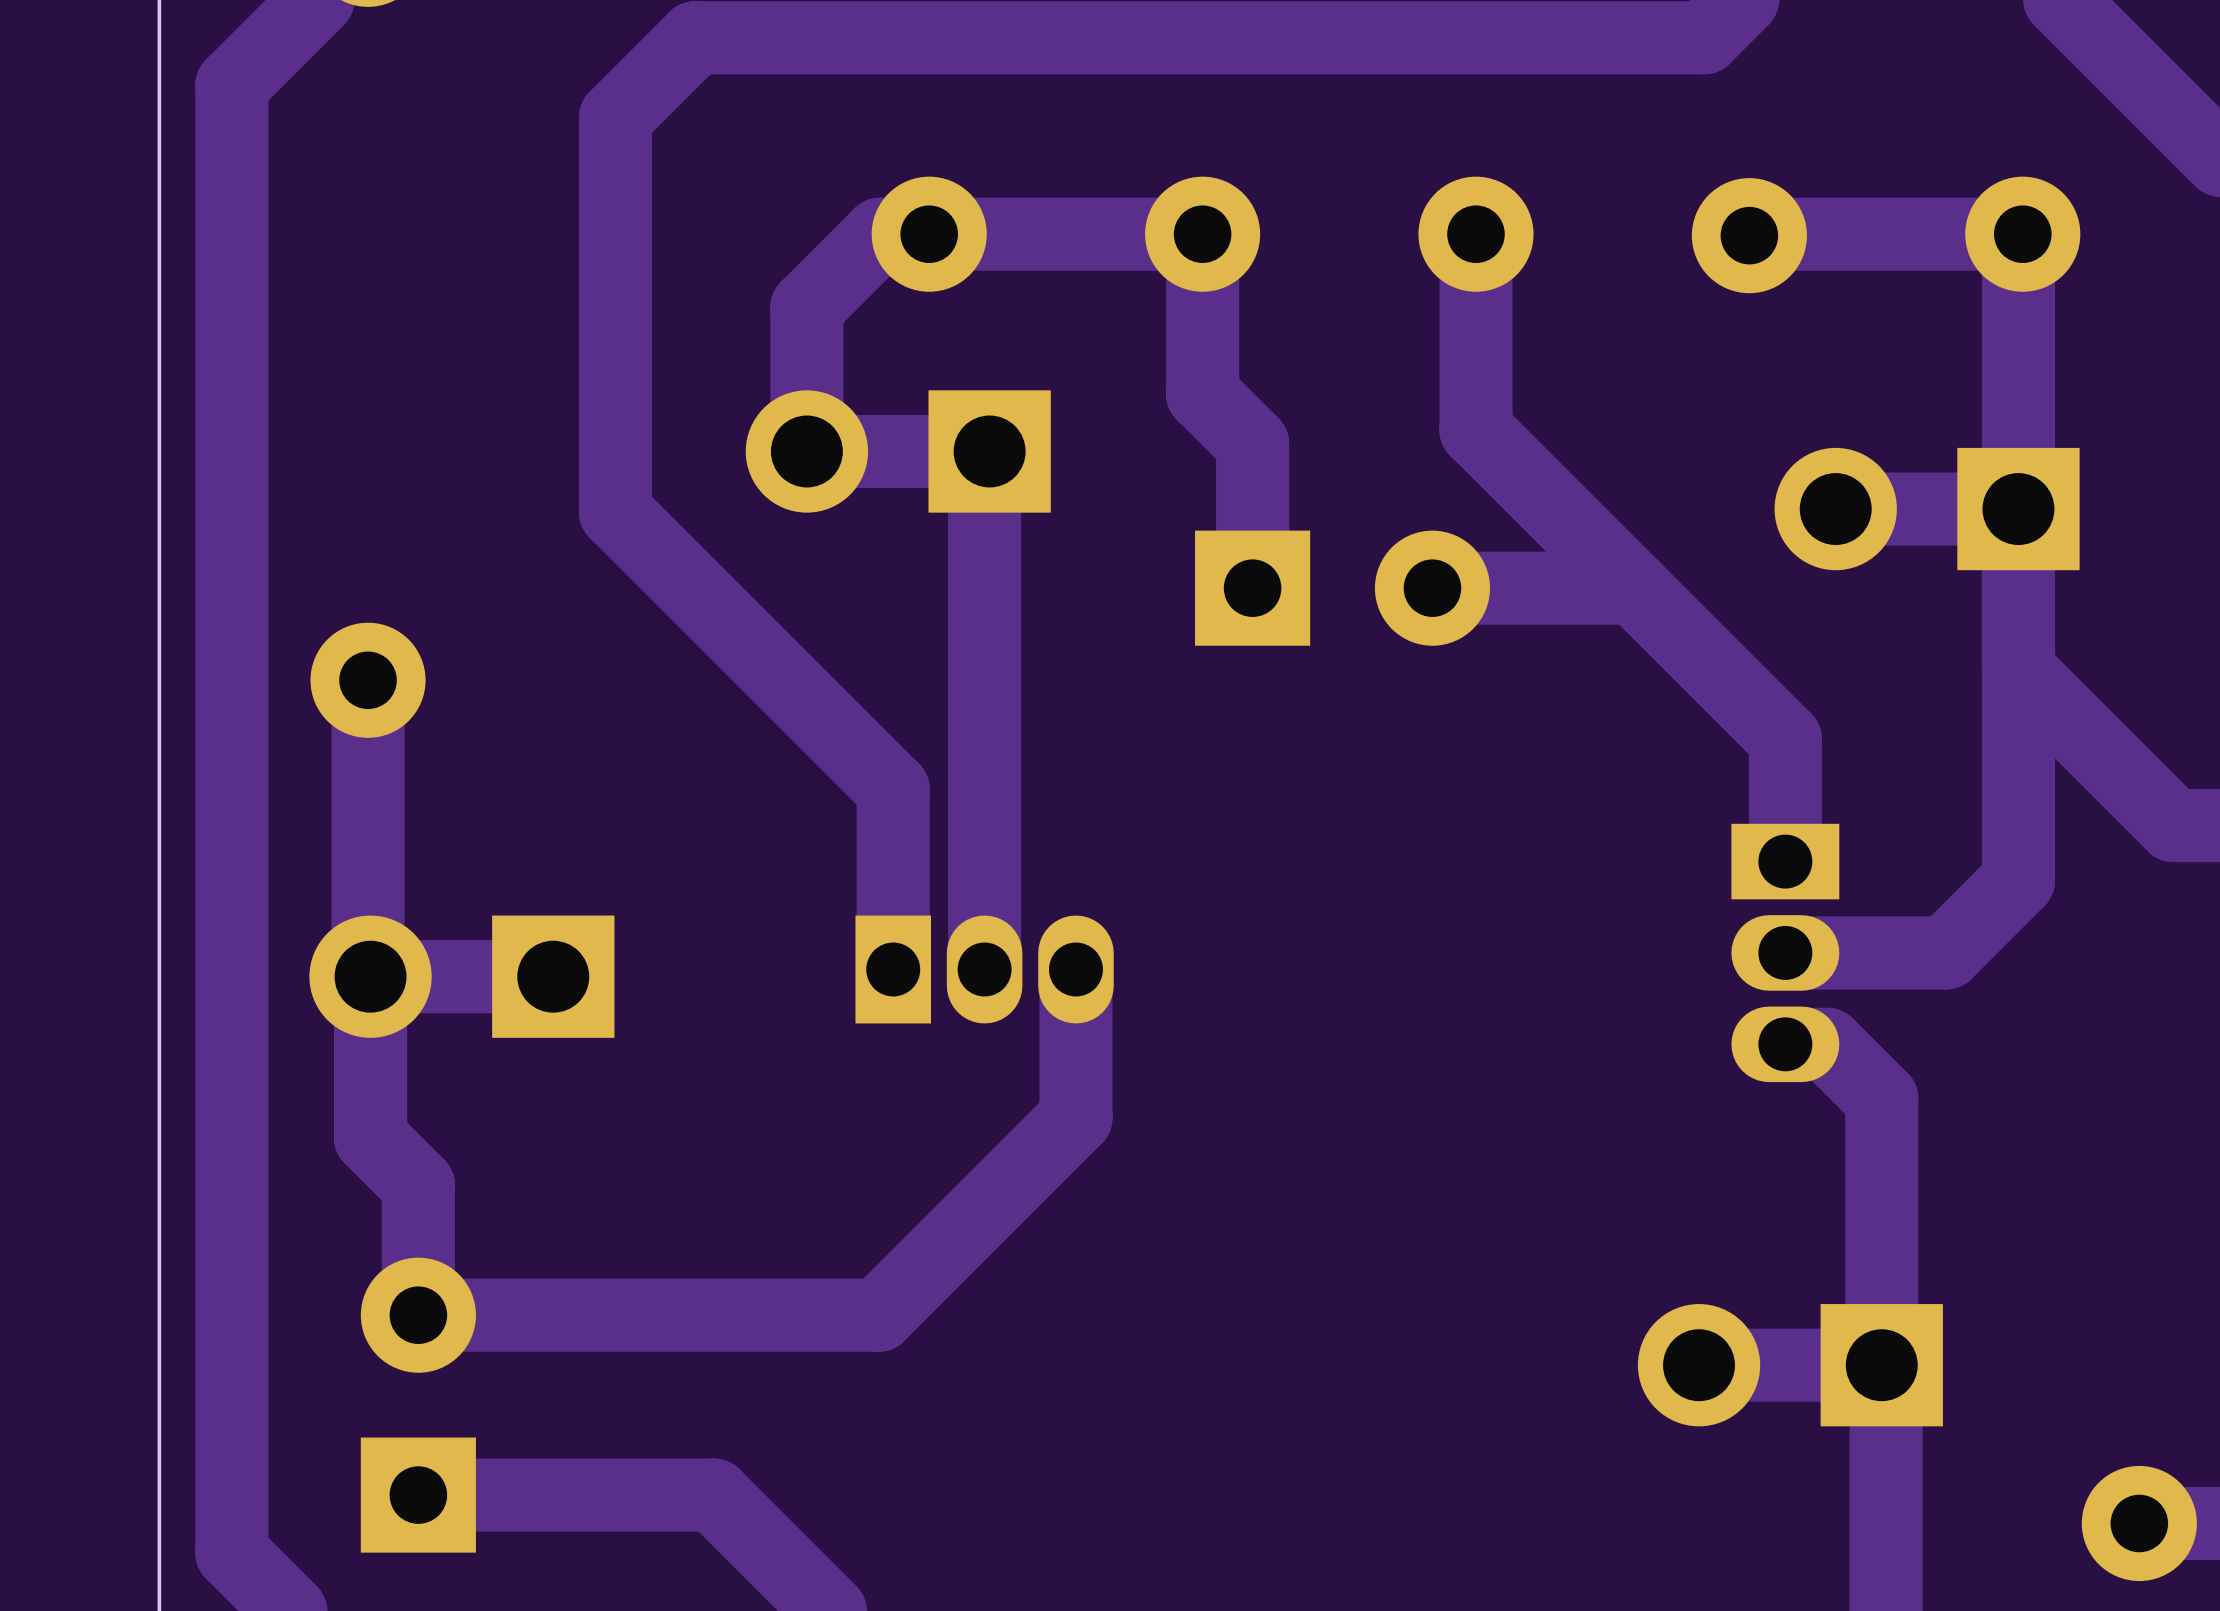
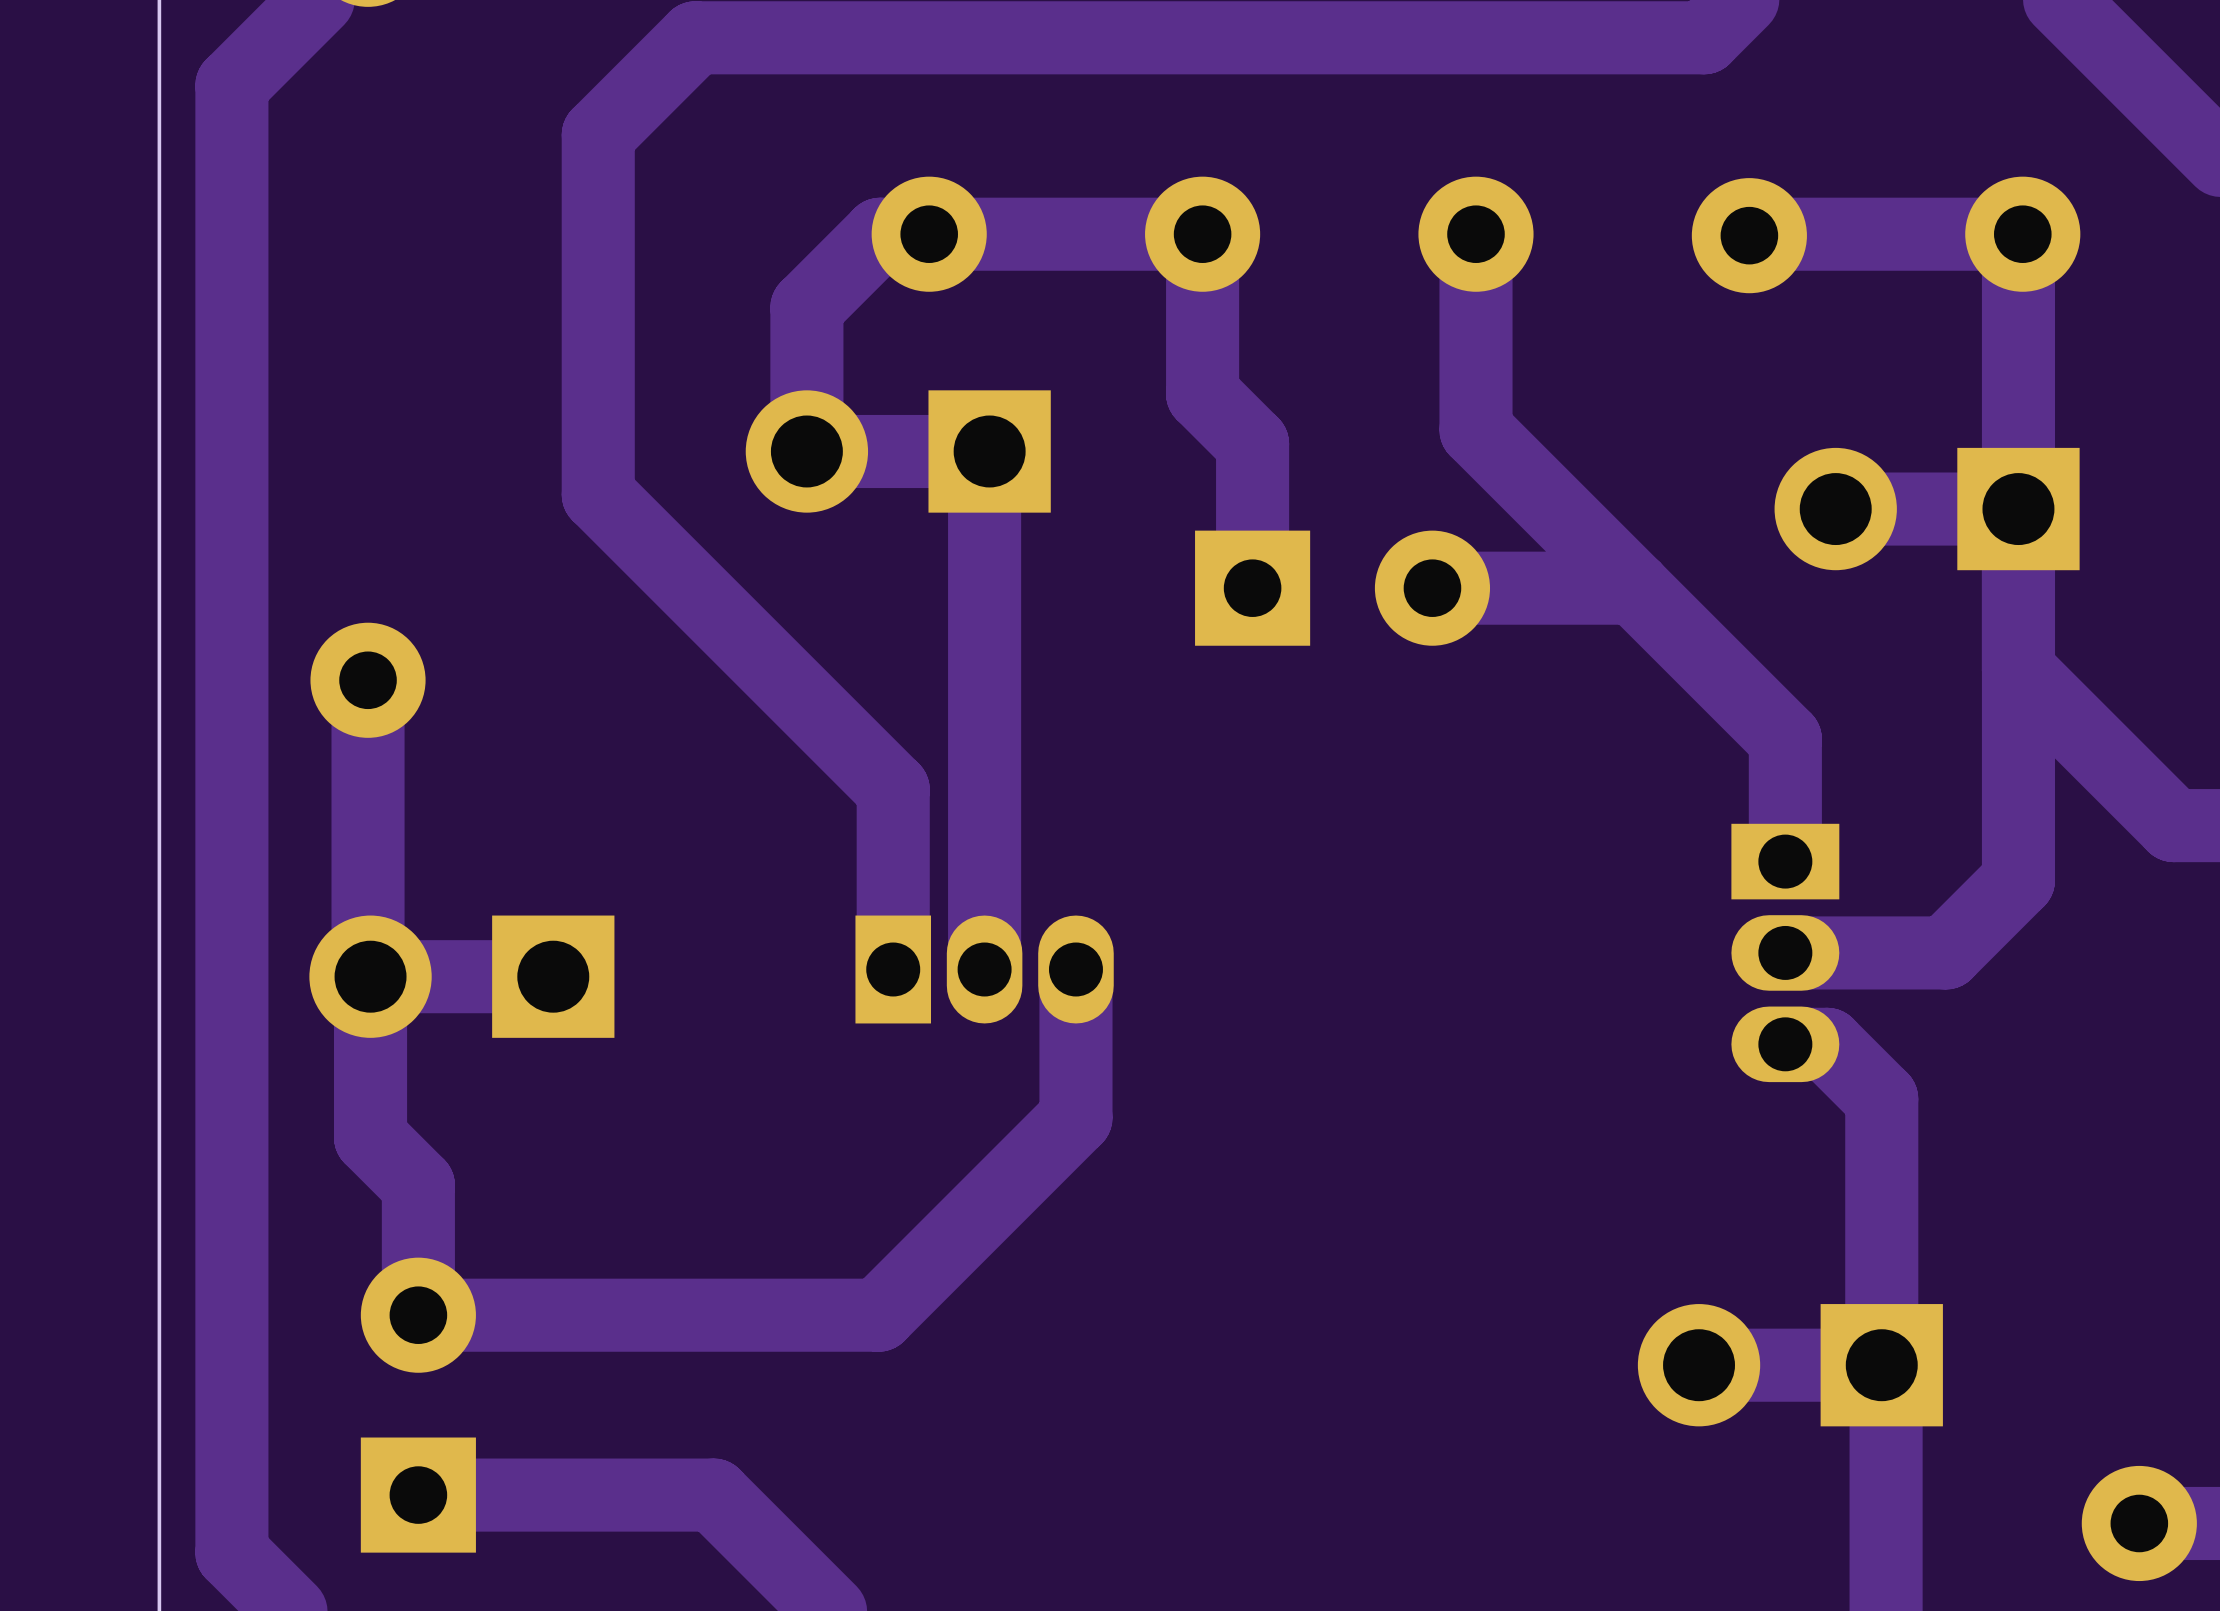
track: (615, 117) (615, 511) -> (615, 117) (598, 134) (598, 494) (615, 511)

